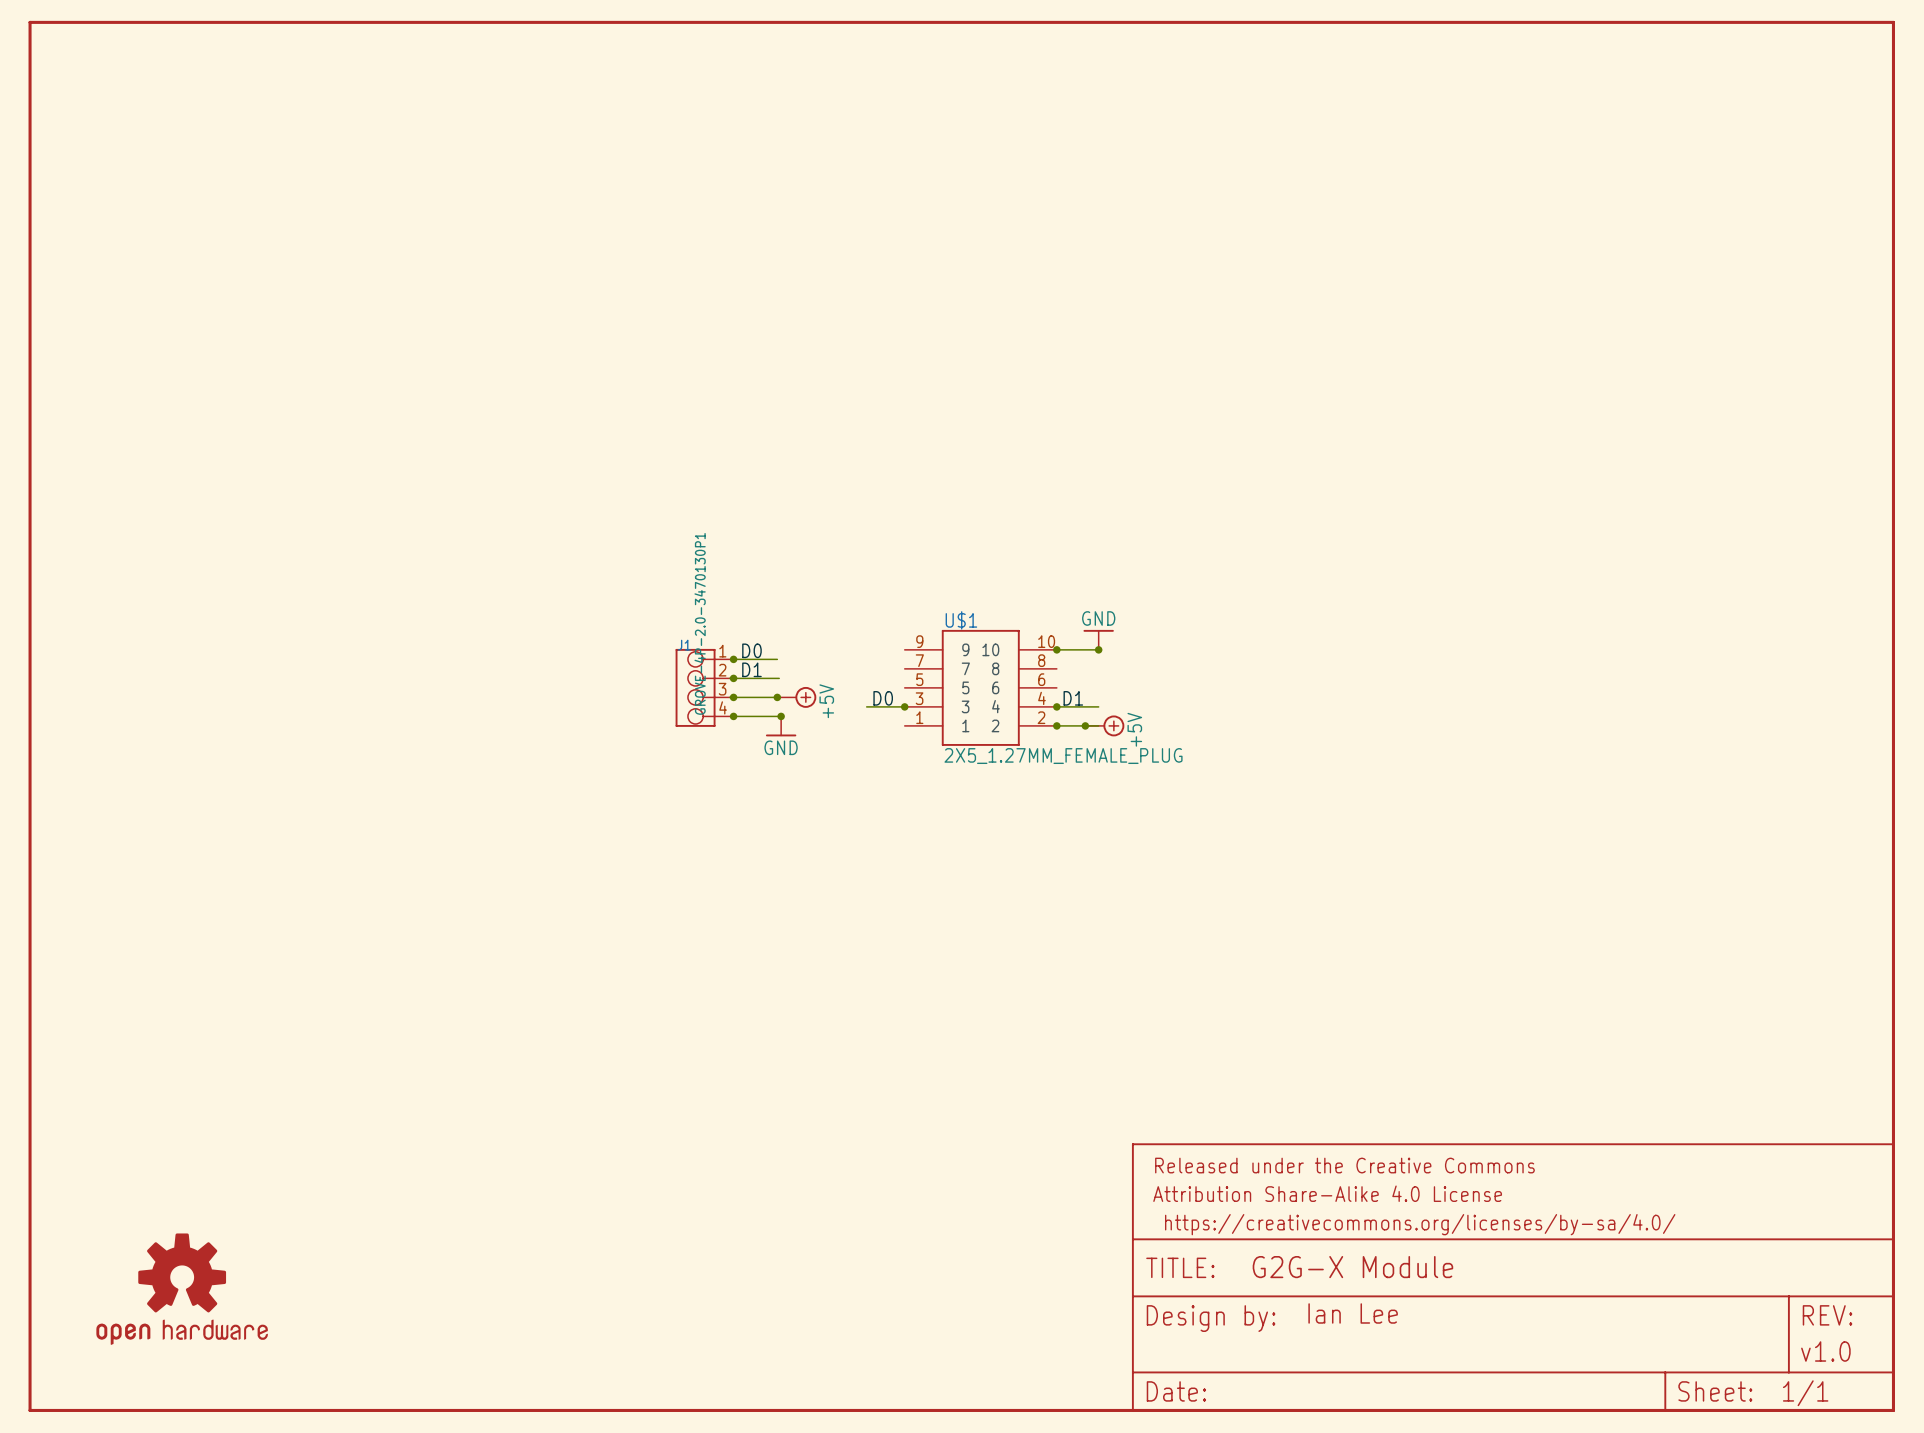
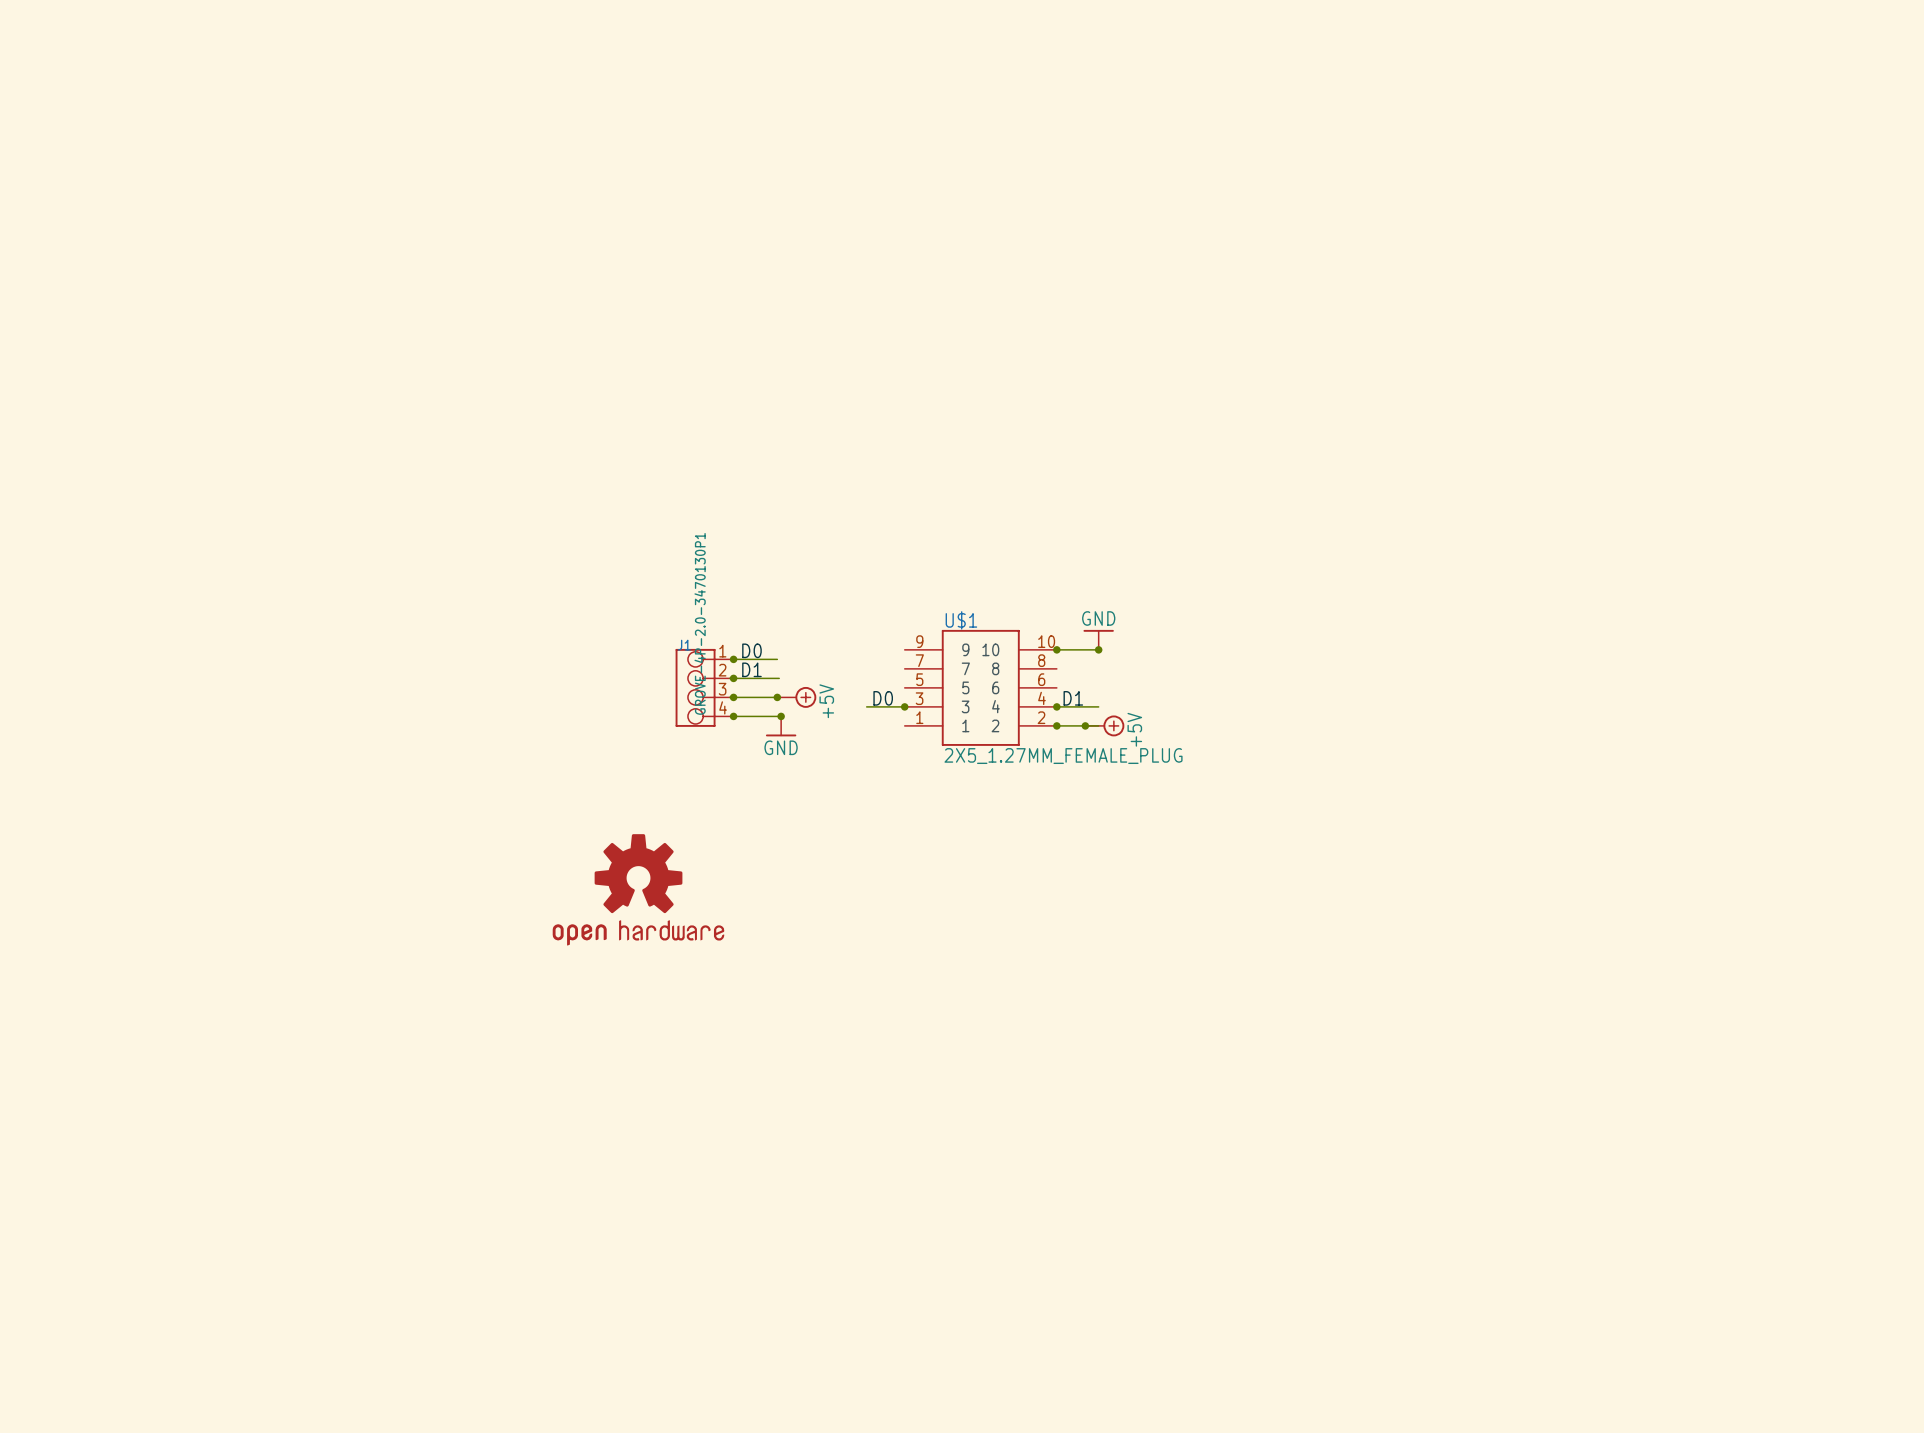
part: (961, 716) -> none
part: none -> (638, 889)
part: (1513, 1277) -> none
part: (182, 1289) -> none

